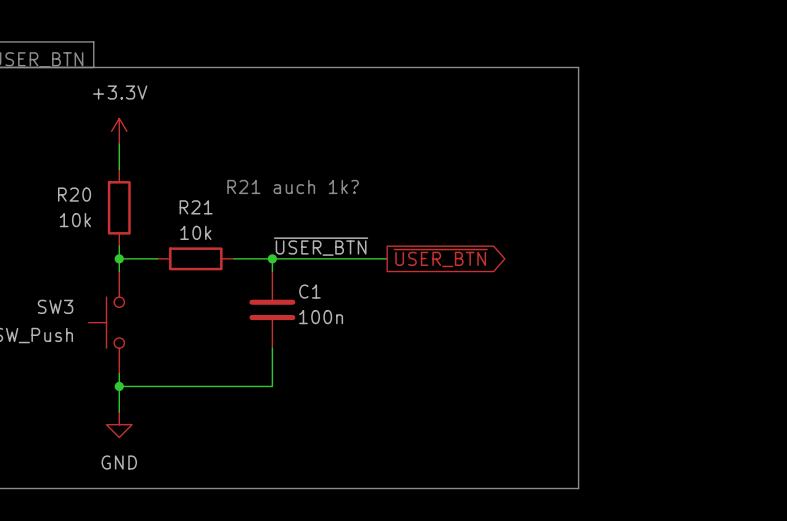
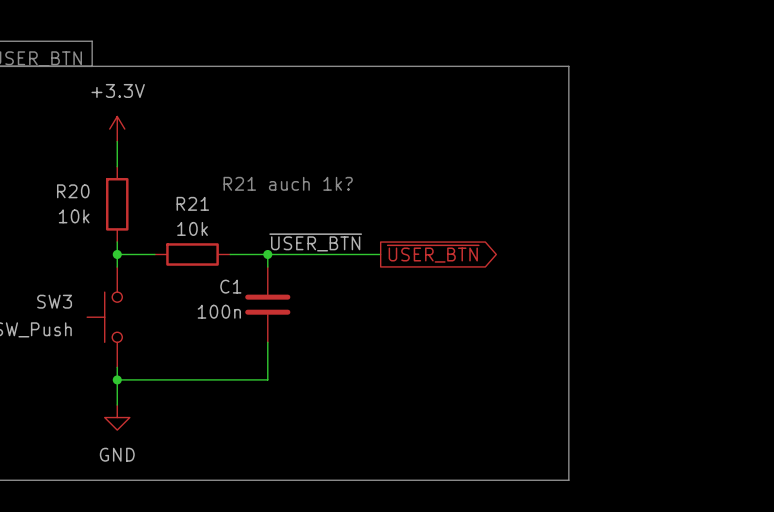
C1 name position: C1 (309, 291) -> C1 (230, 286)
C1 value position: 100n (321, 317) -> 100n (219, 311)

